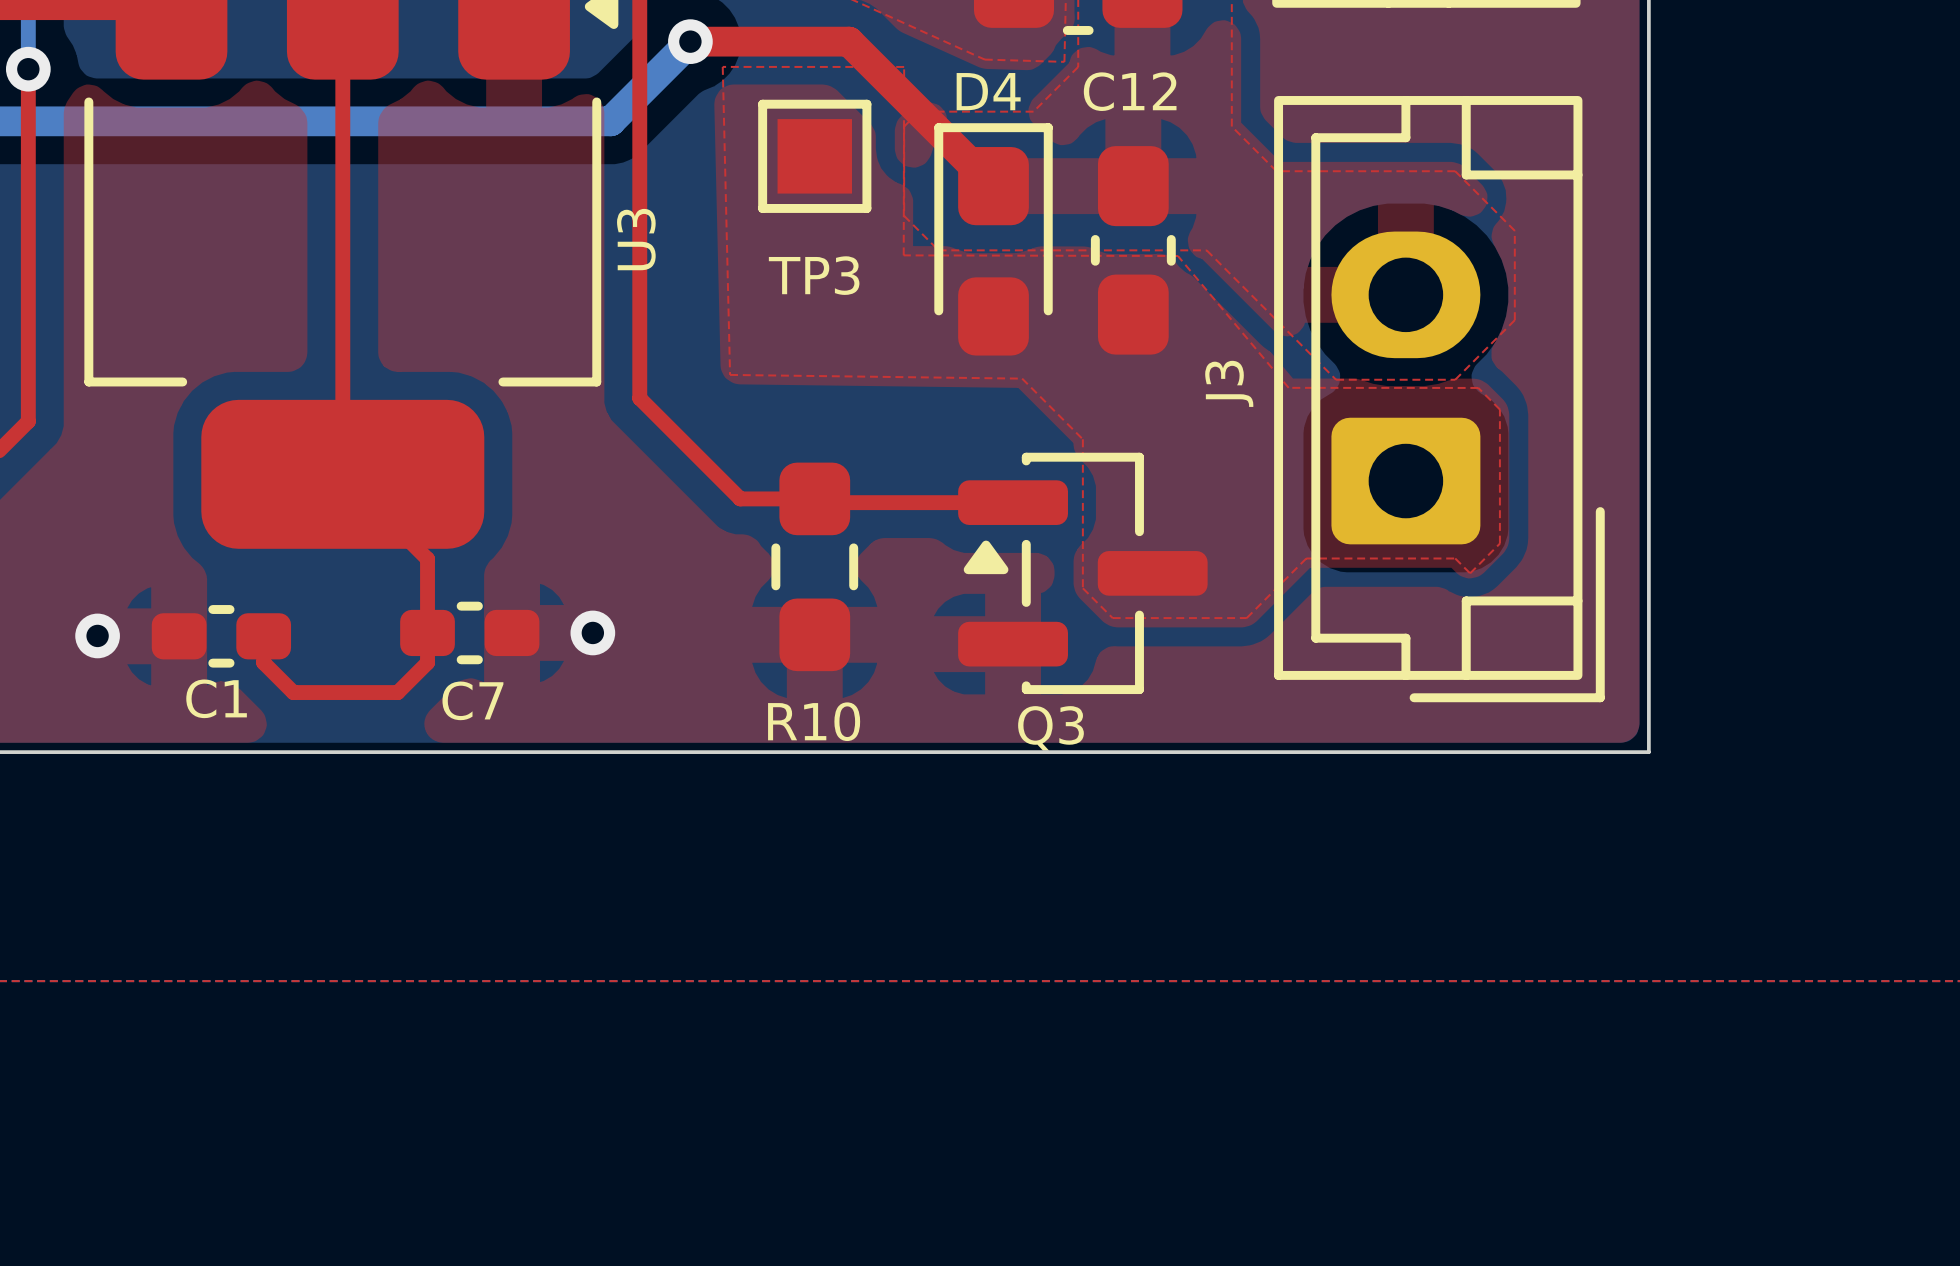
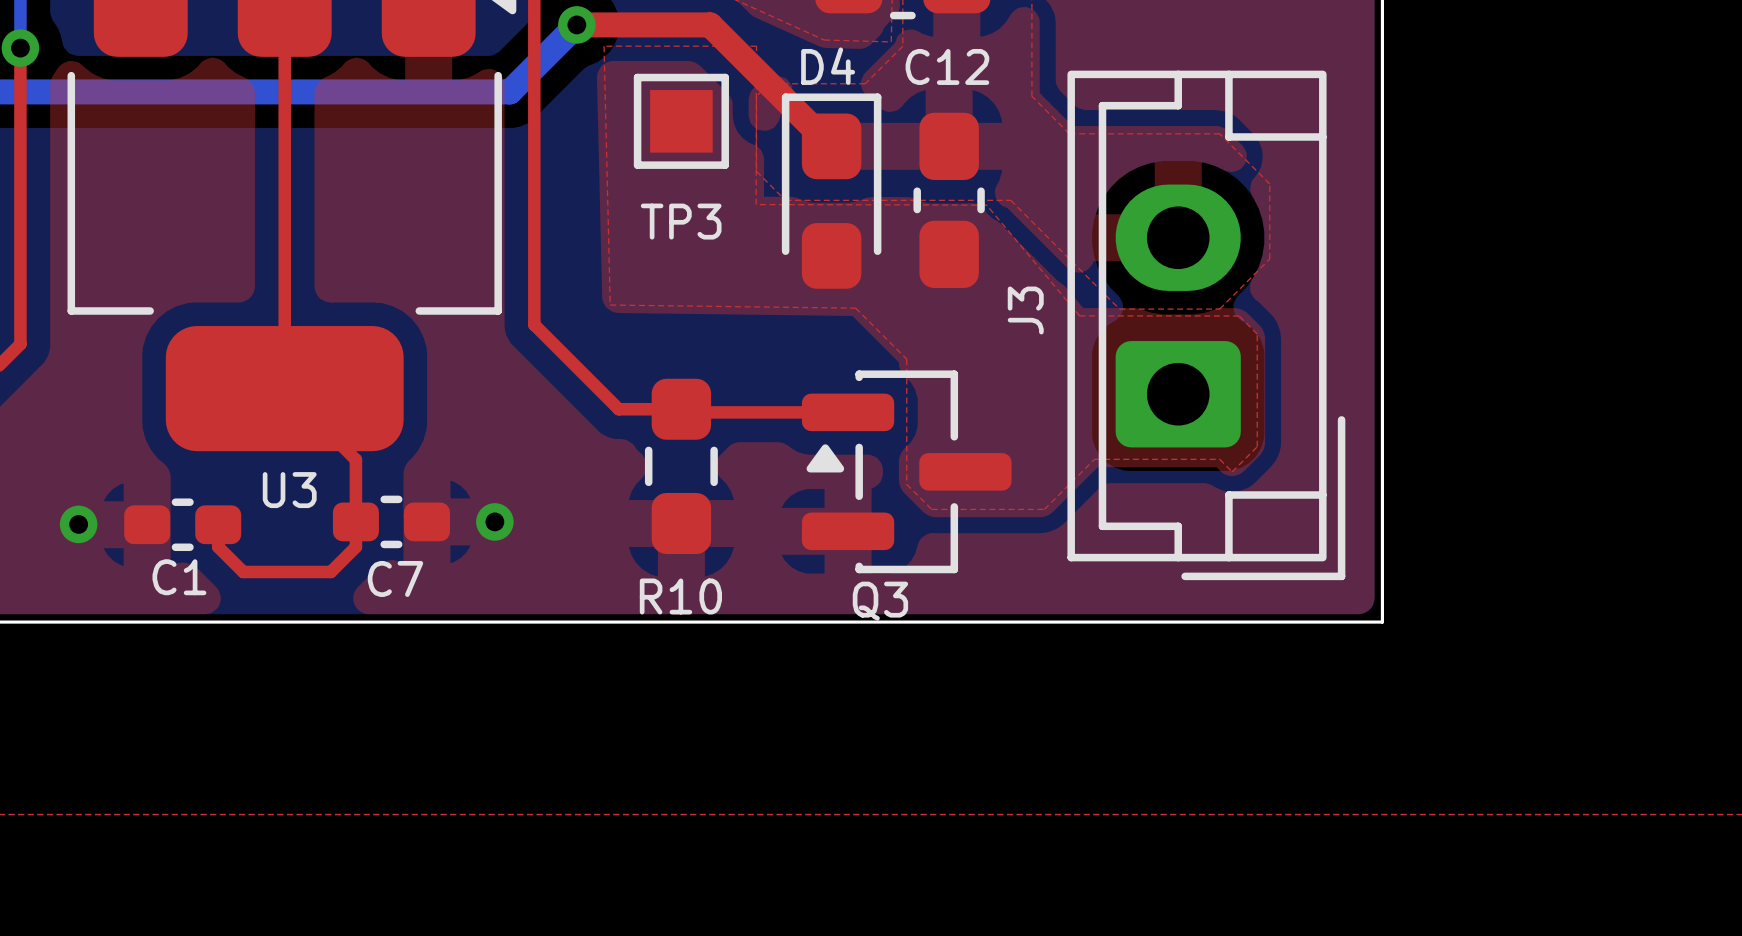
U3 name rotation: 0° (636, 239) -> 90° clockwise (289, 490)
U3 name position: U3 (636, 239) -> U3 (289, 490)

